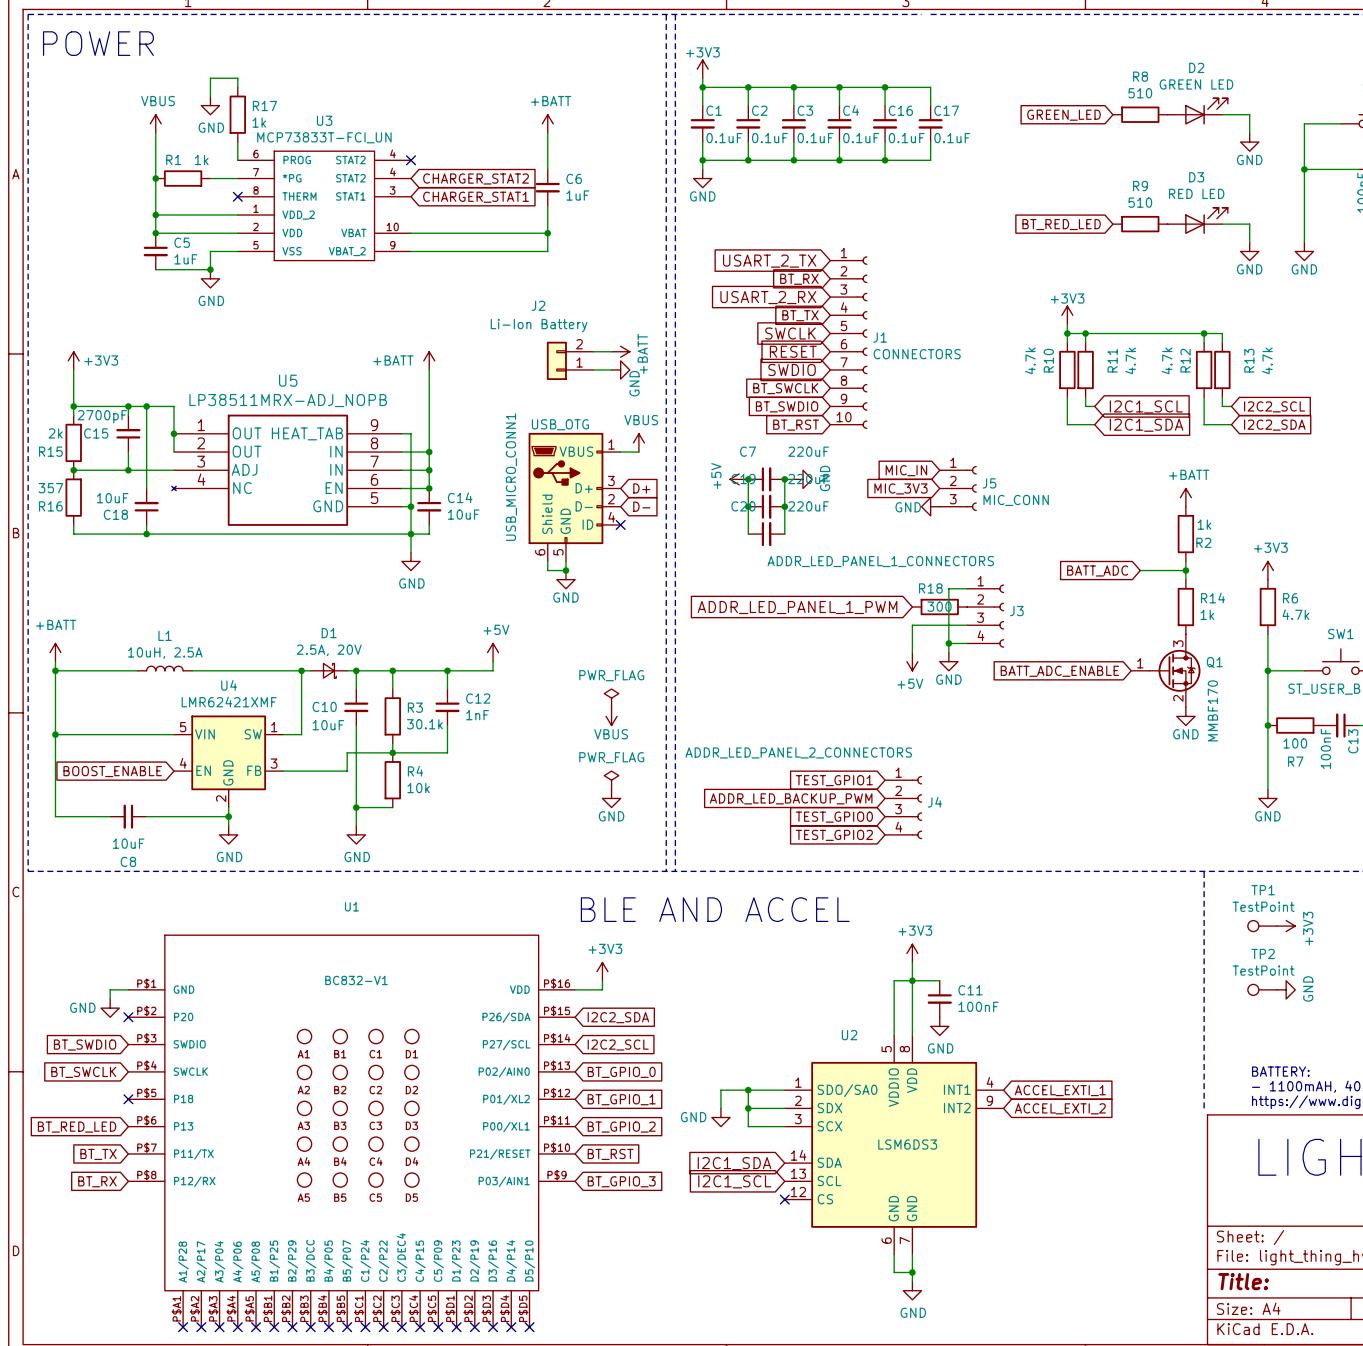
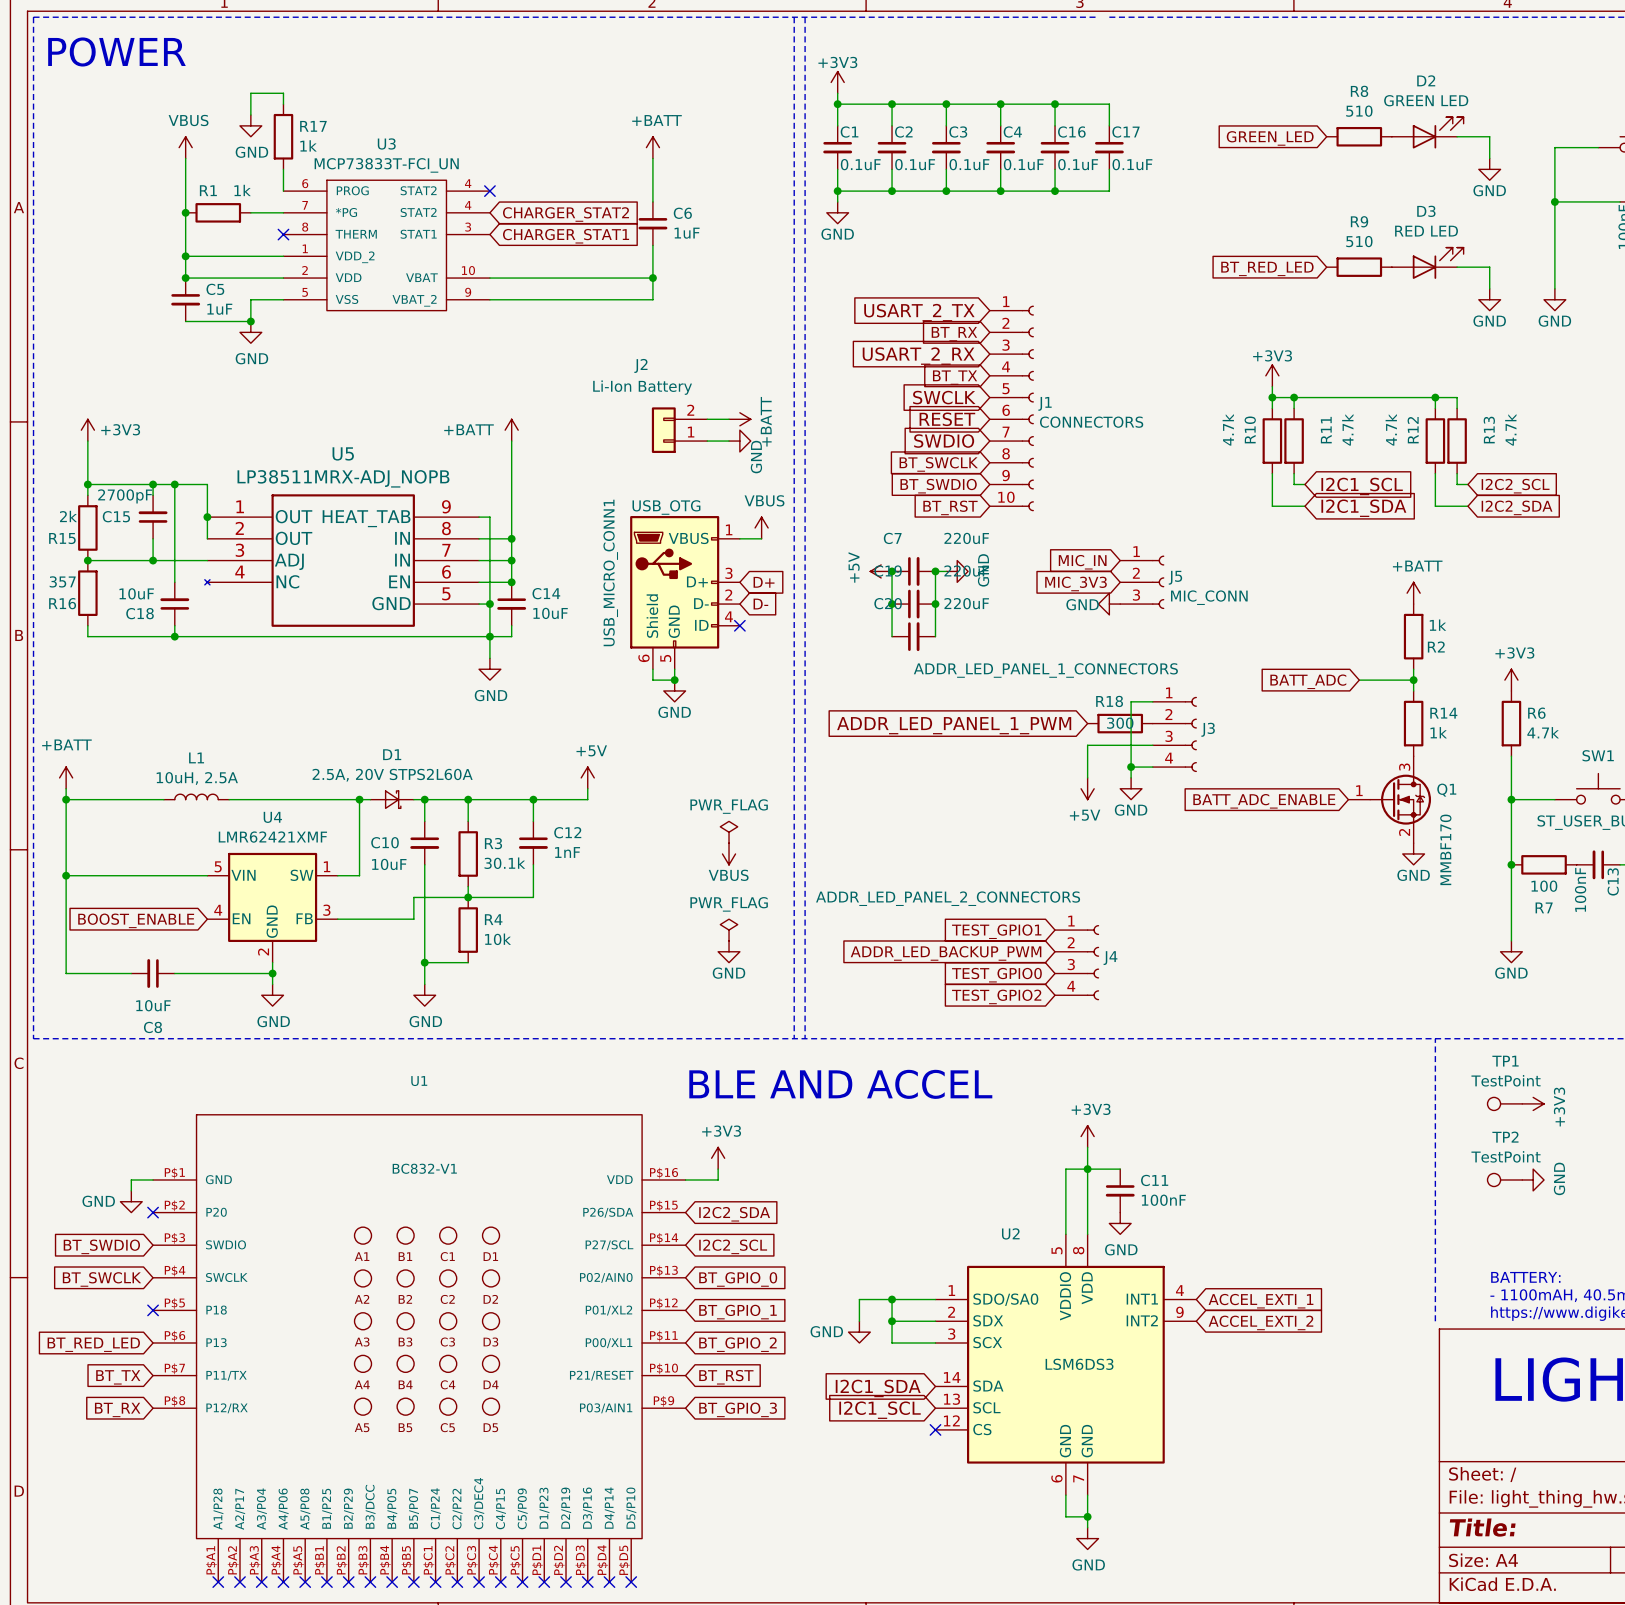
D1 value: 2.5A, 20V (329, 650) -> 2.5A, 20V STPS2L60A (392, 775)

